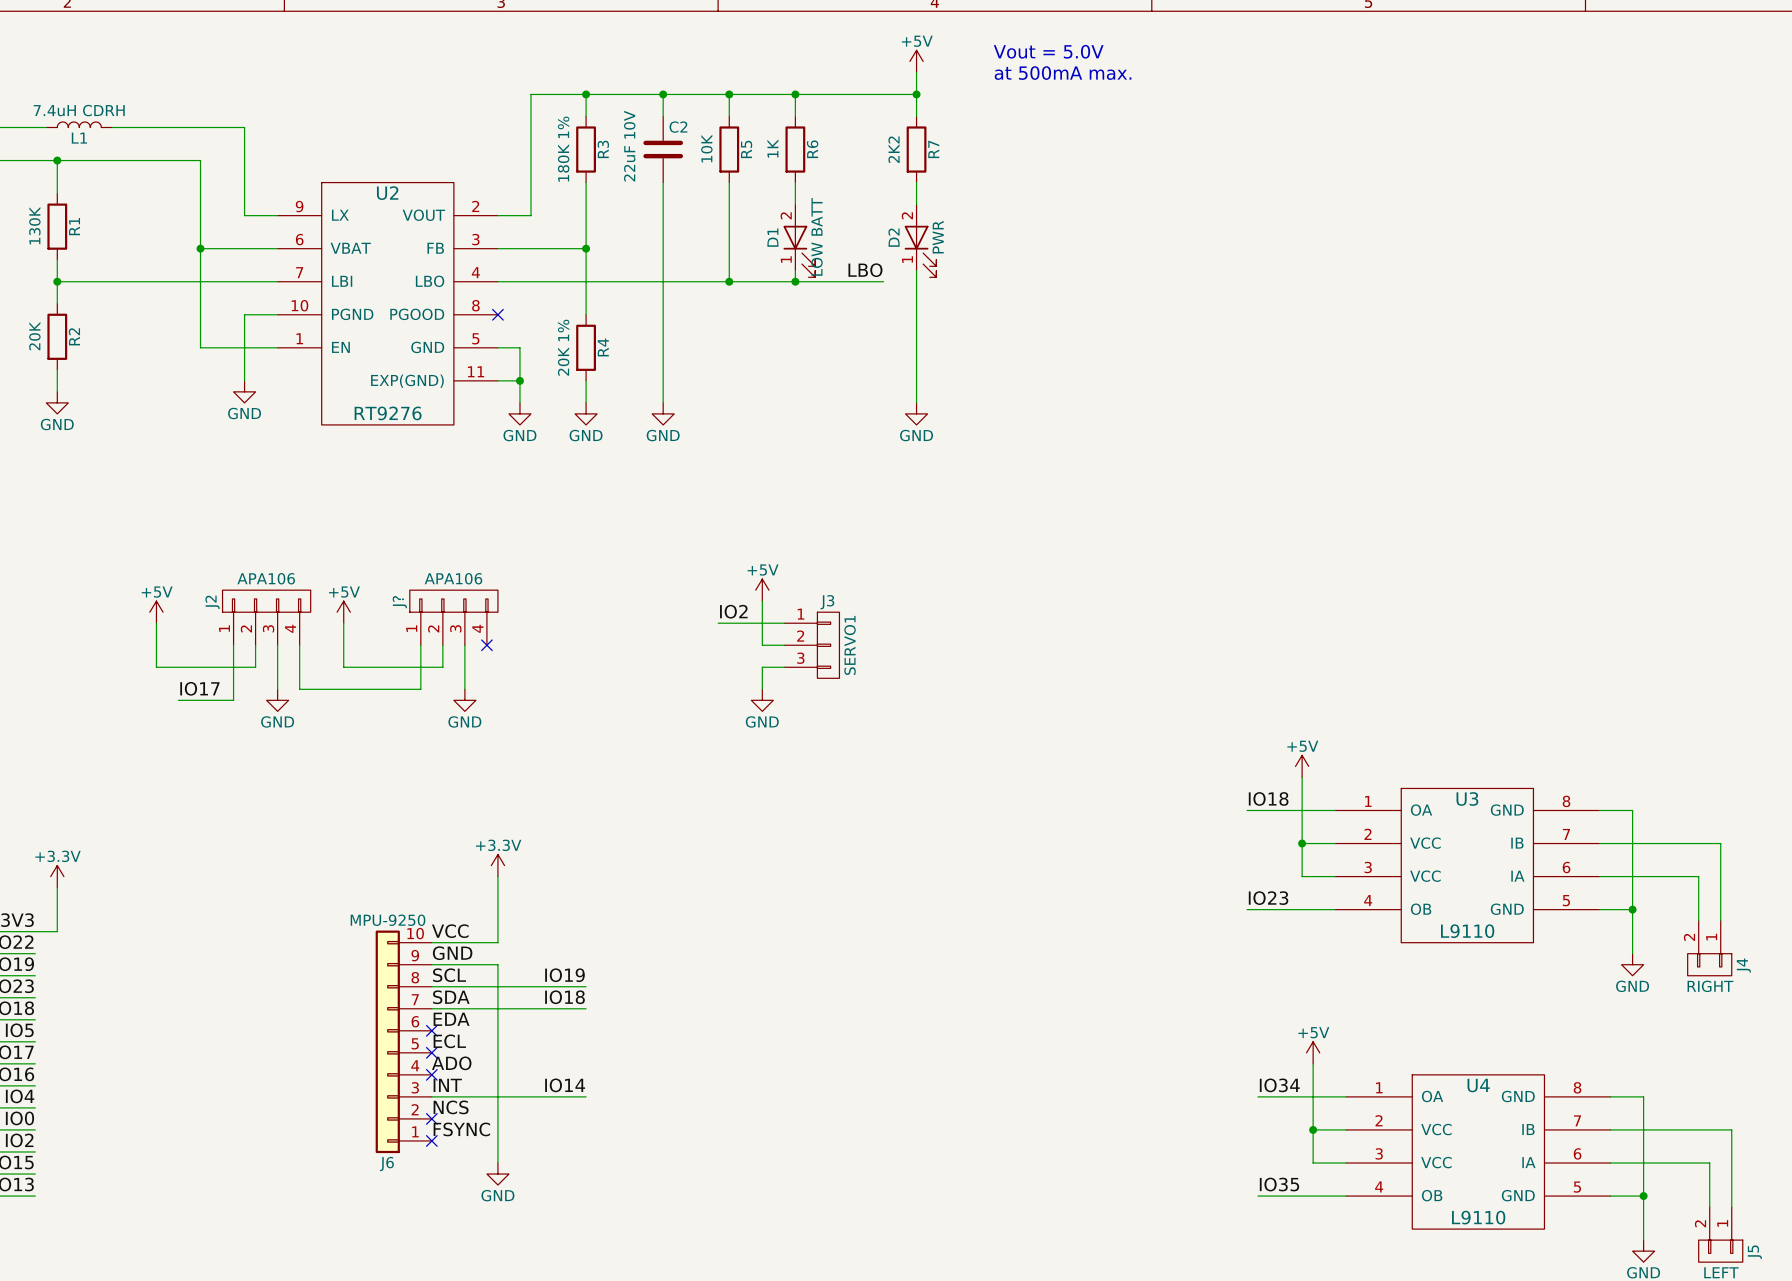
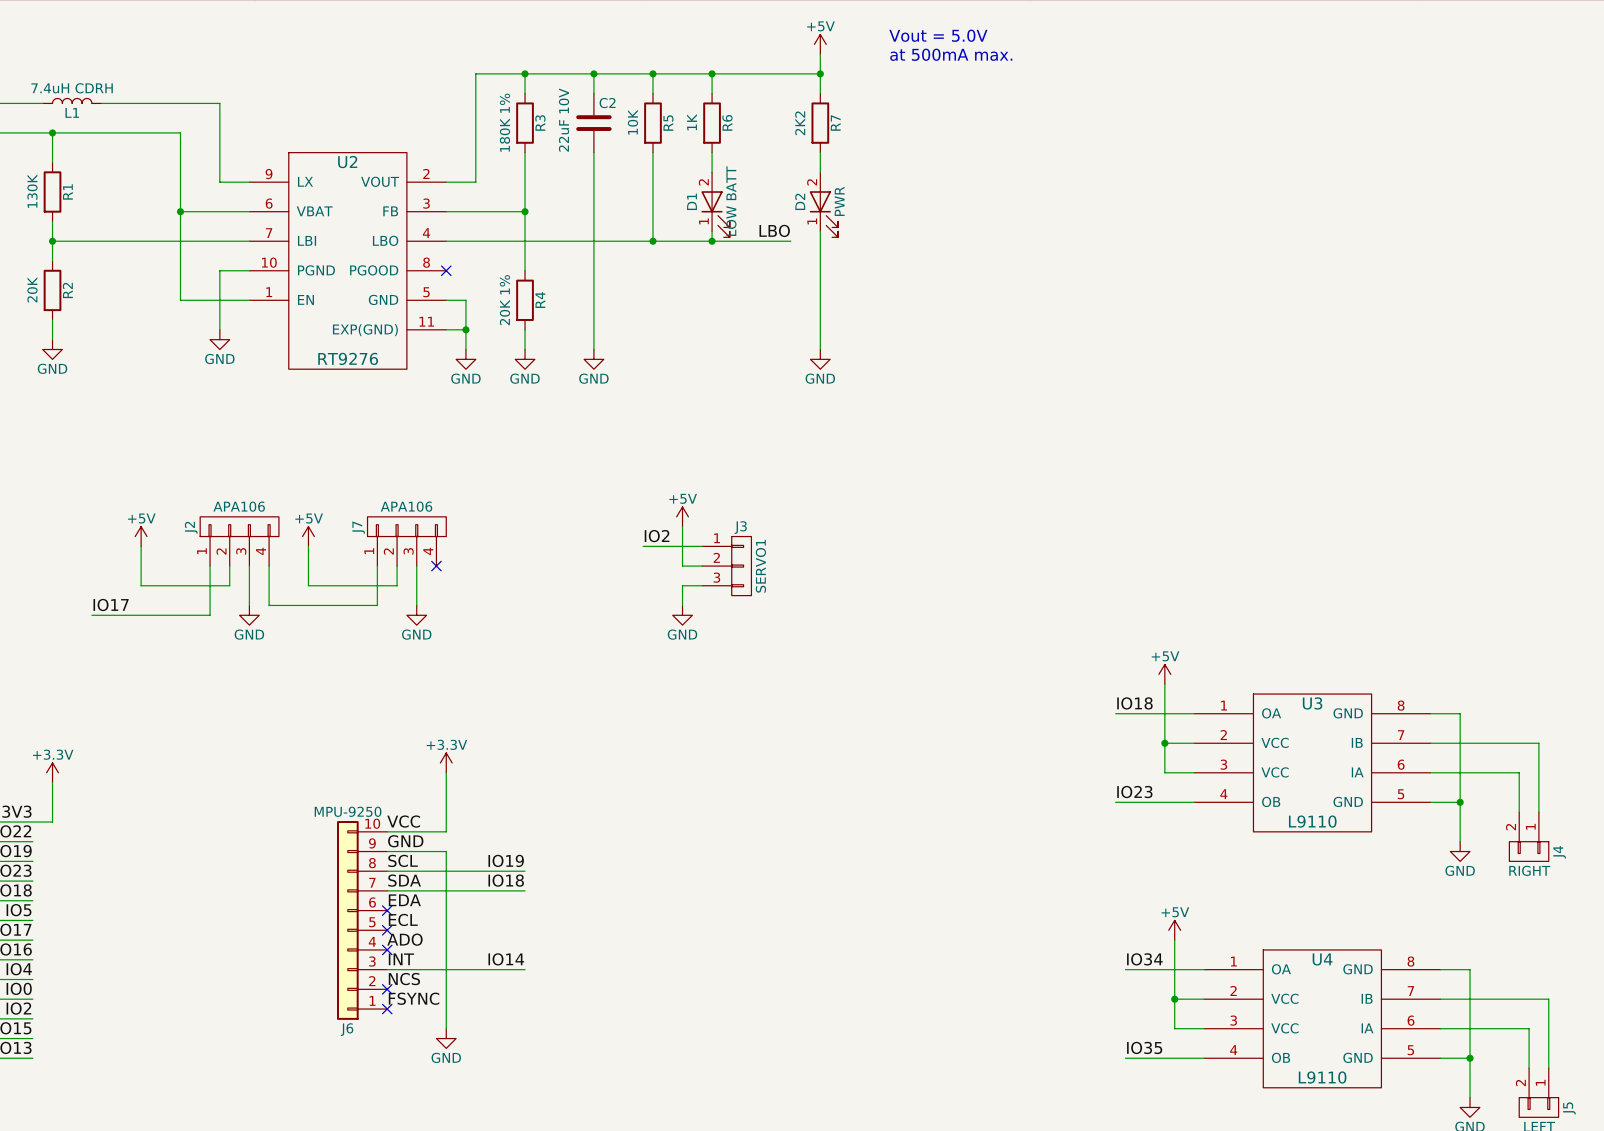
J? name: J? (399, 602) -> J7 (358, 527)
label position: IO17 (199, 688) -> IO17 (111, 604)
wire: none -> (91, 615) (160, 615)

